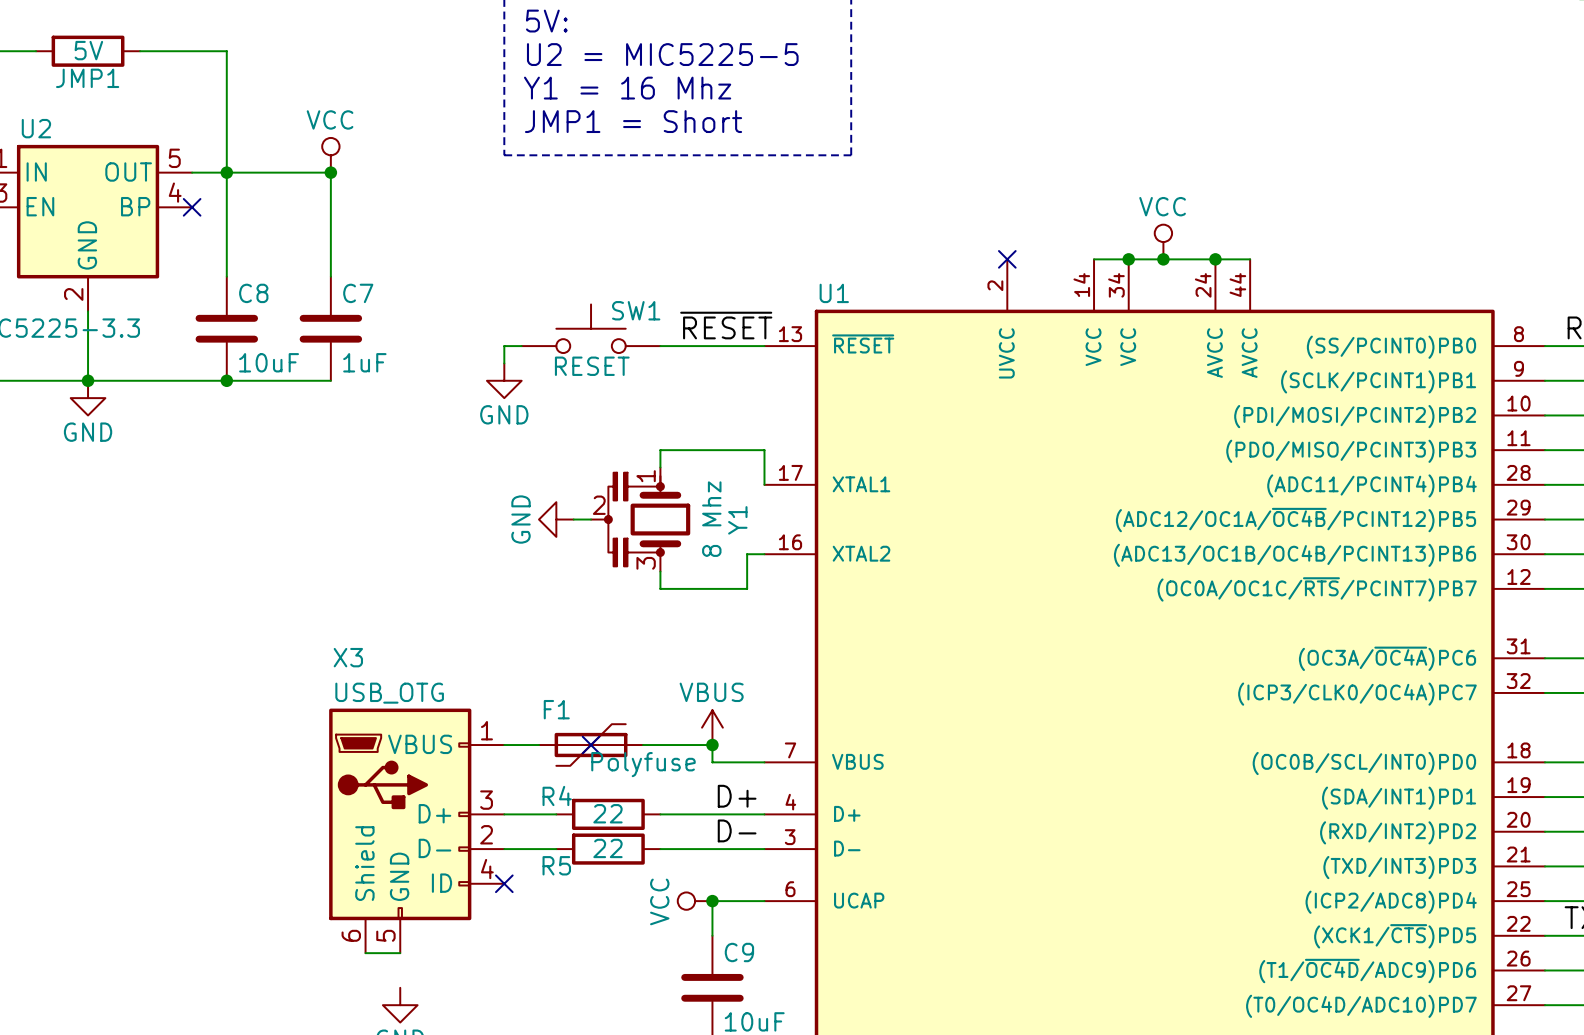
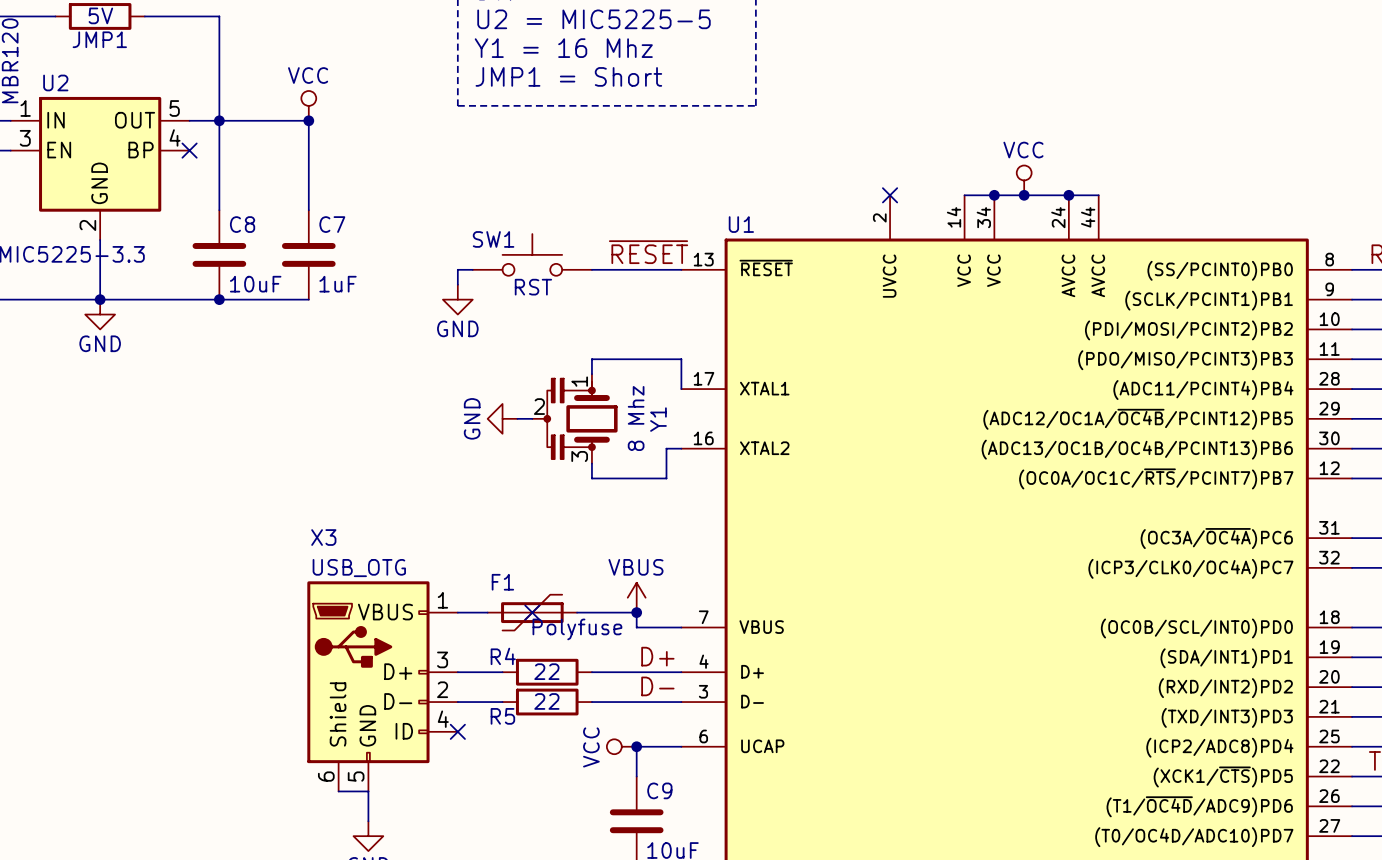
SW1 name position: SW1 (636, 310) -> SW1 (493, 239)
SW1 value: RESET (592, 366) -> RST (533, 287)
wire: none -> (368, 791) (368, 821)

